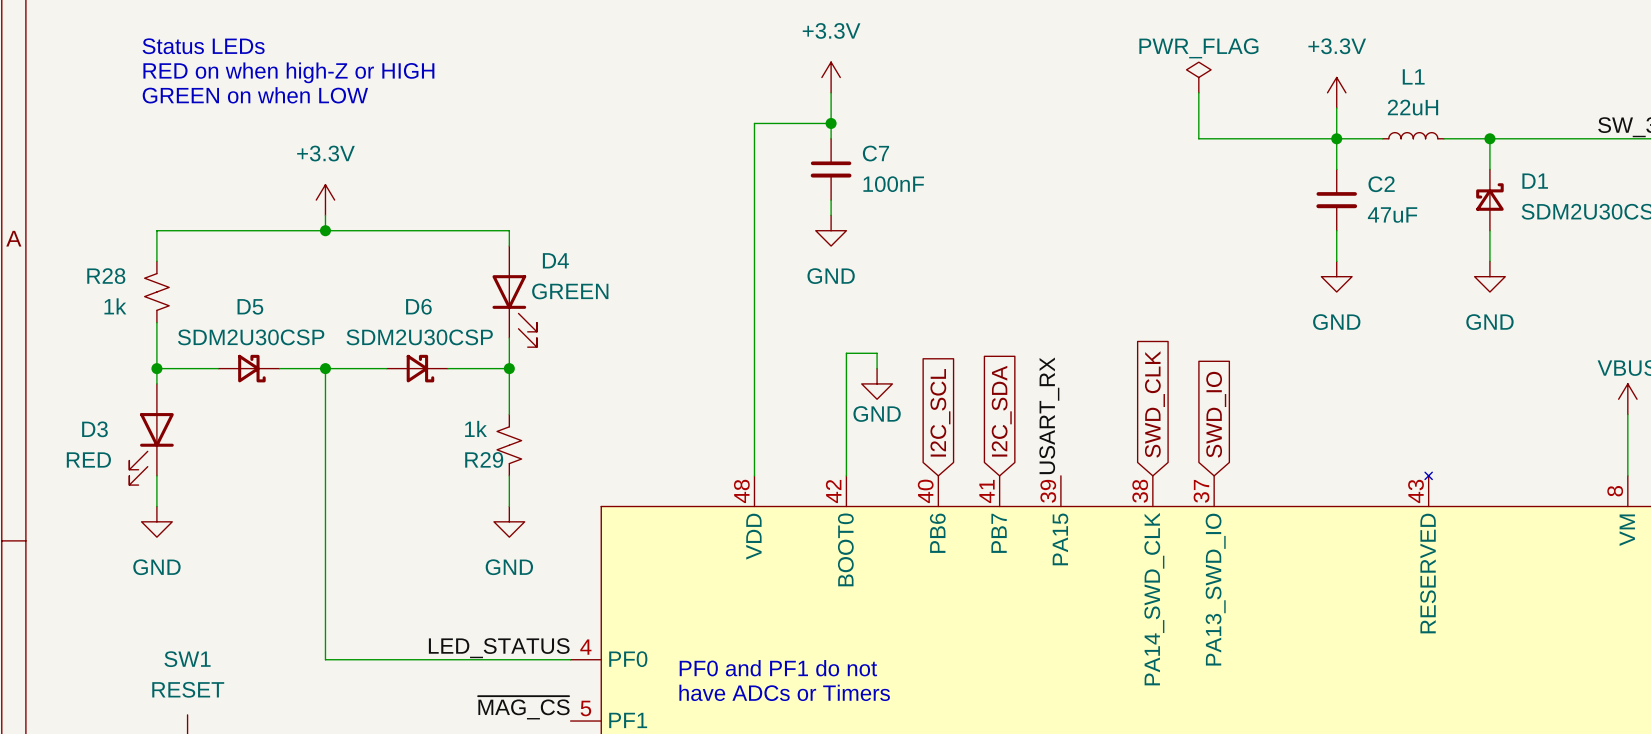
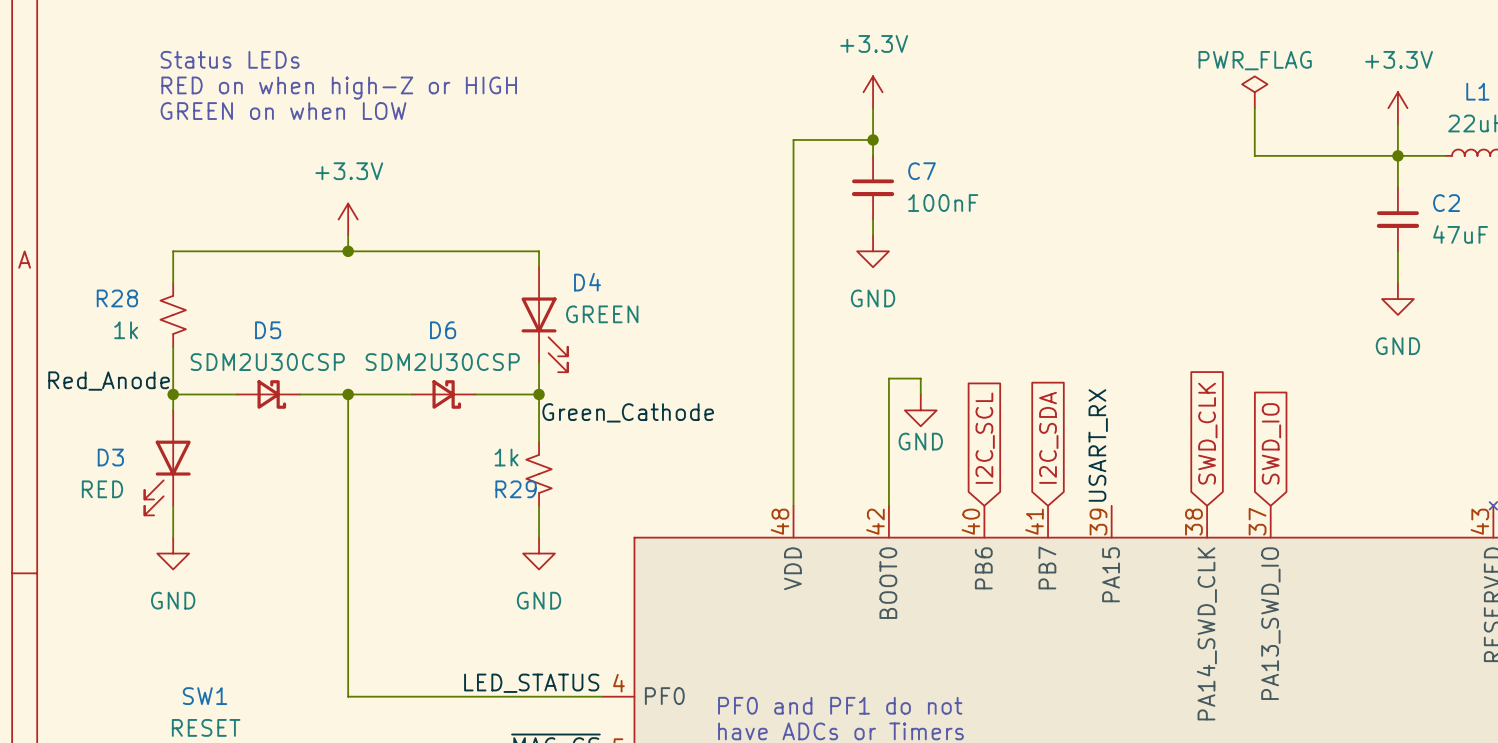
label: none -> Red_Anode (109, 381)
label: none -> Green_Cathode (628, 412)

